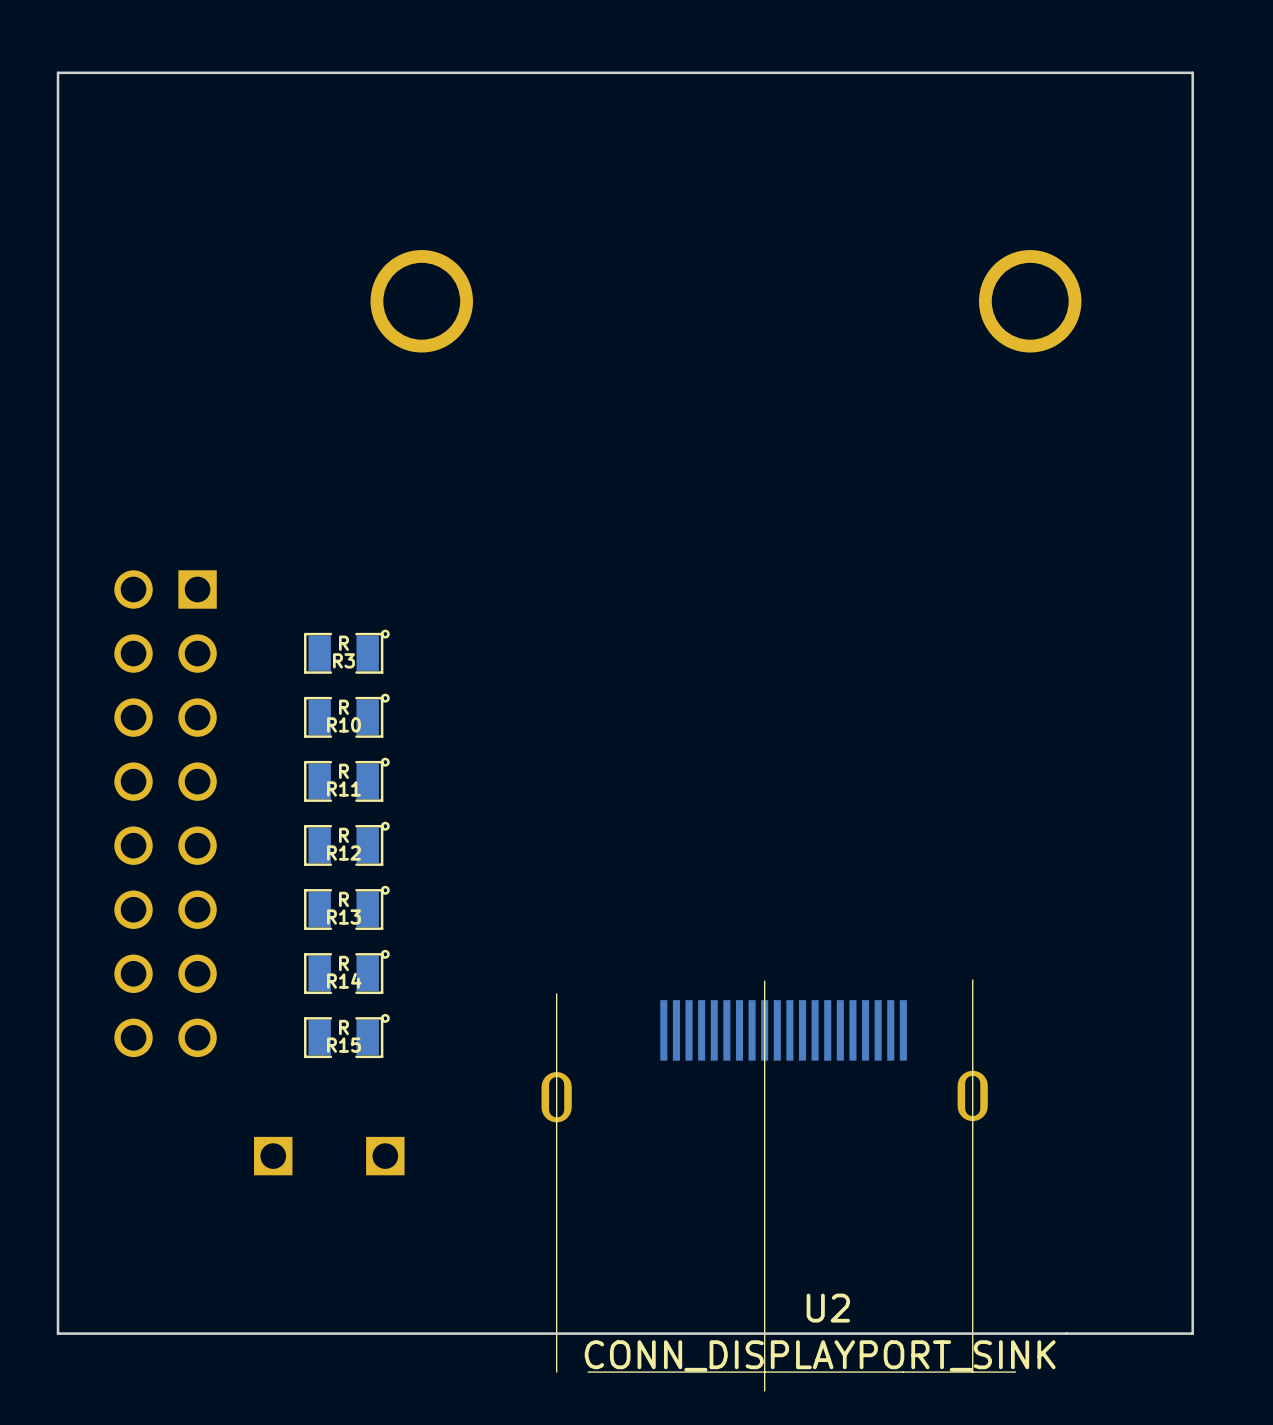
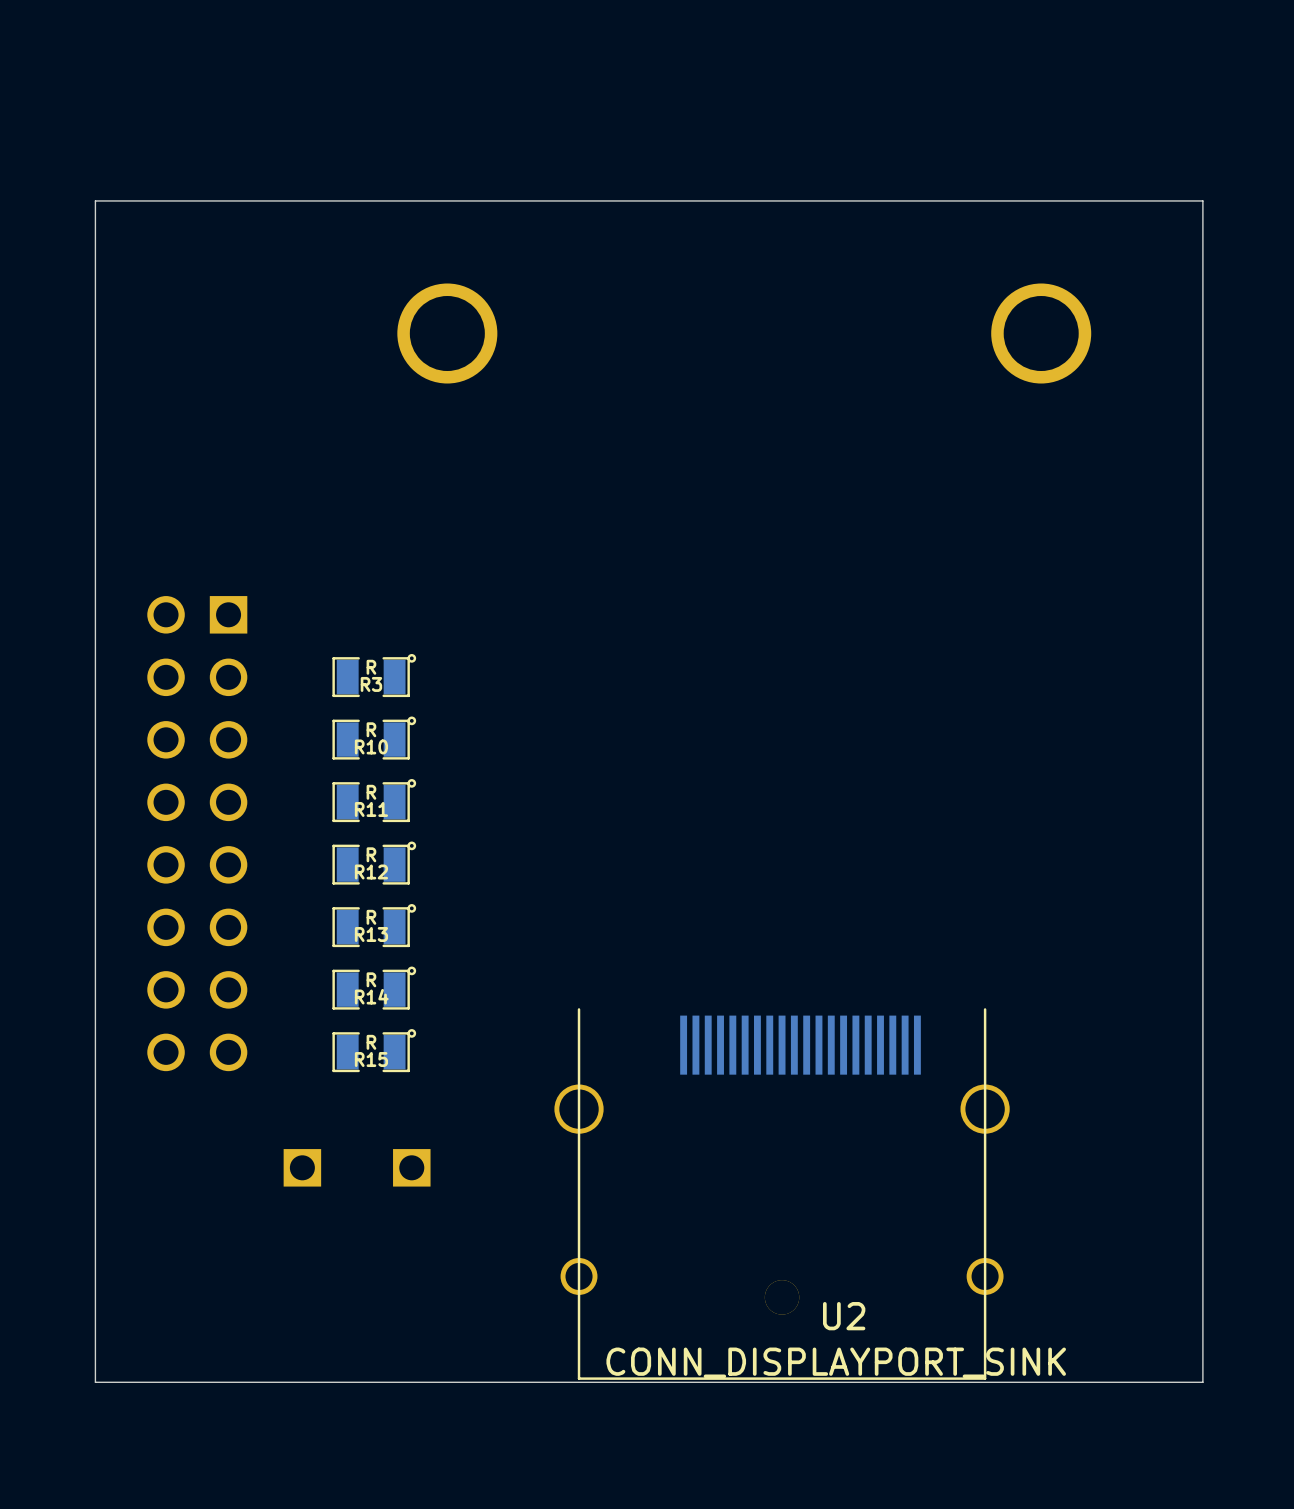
board edge: (1192, 72) (1192, 1333) (58, 1333) (58, 72) (1192, 72) -> (1202, 200) (1202, 1382) (95, 1382) (95, 200) (1202, 200)
U2 footprint: [541, 979, 1016, 1391] -> [554, 1008, 1010, 1380]

